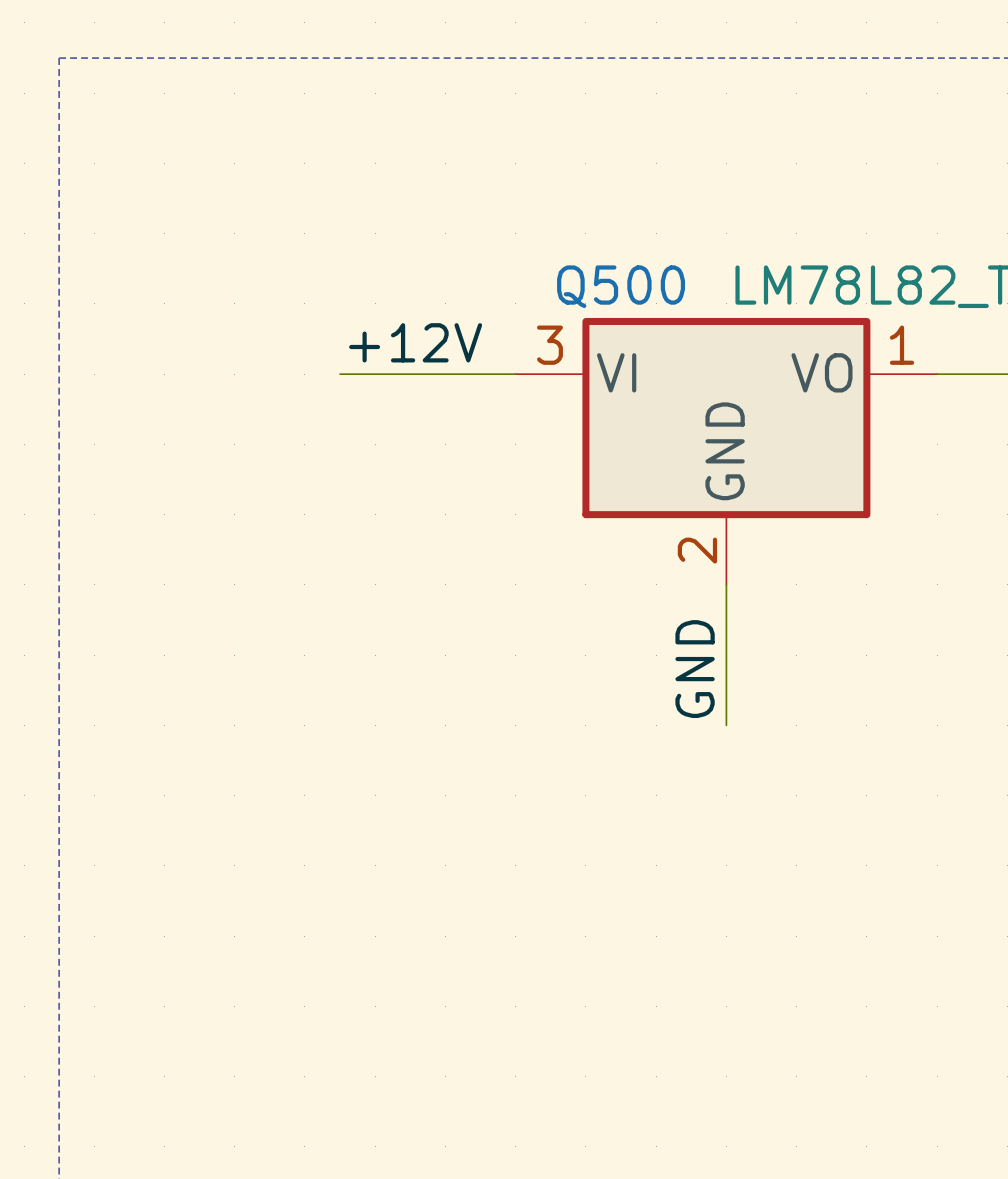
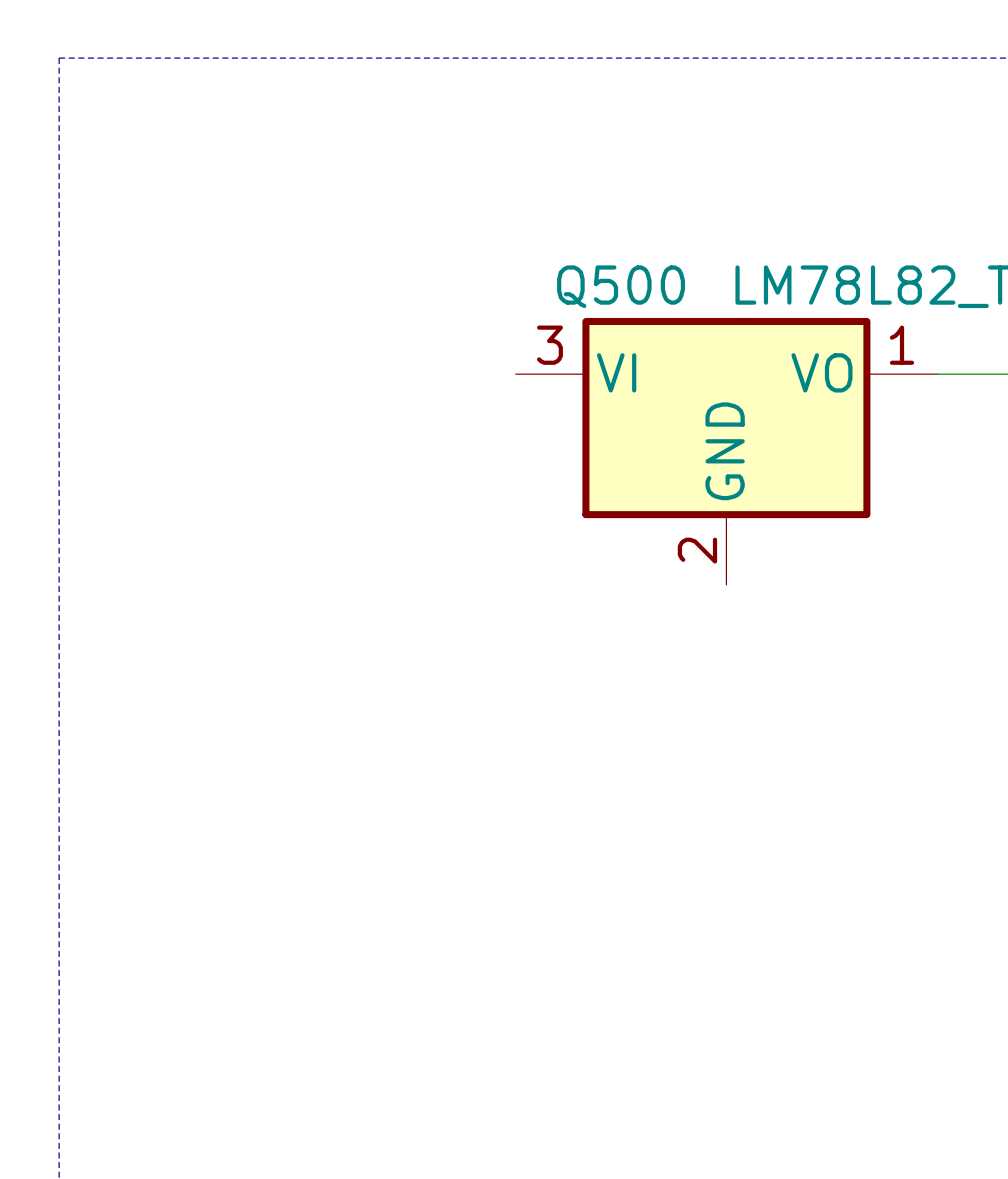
label: +12V (415, 342) -> none
wire: (340, 374) (515, 374) -> none
wire: (726, 584) (726, 725) -> none
label: GND (695, 669) -> none

